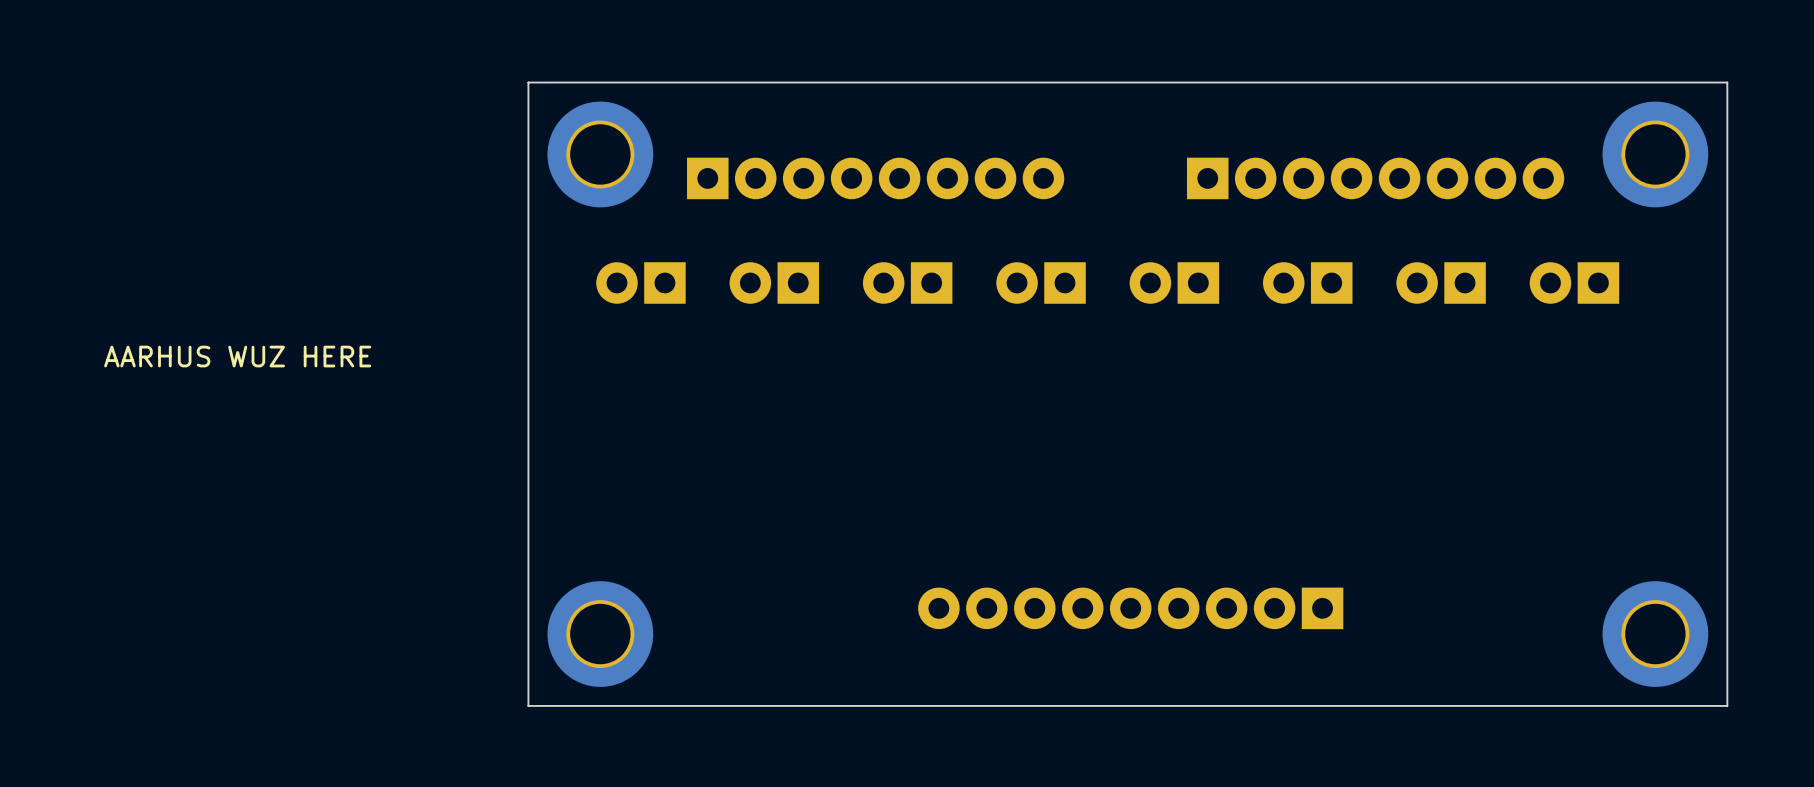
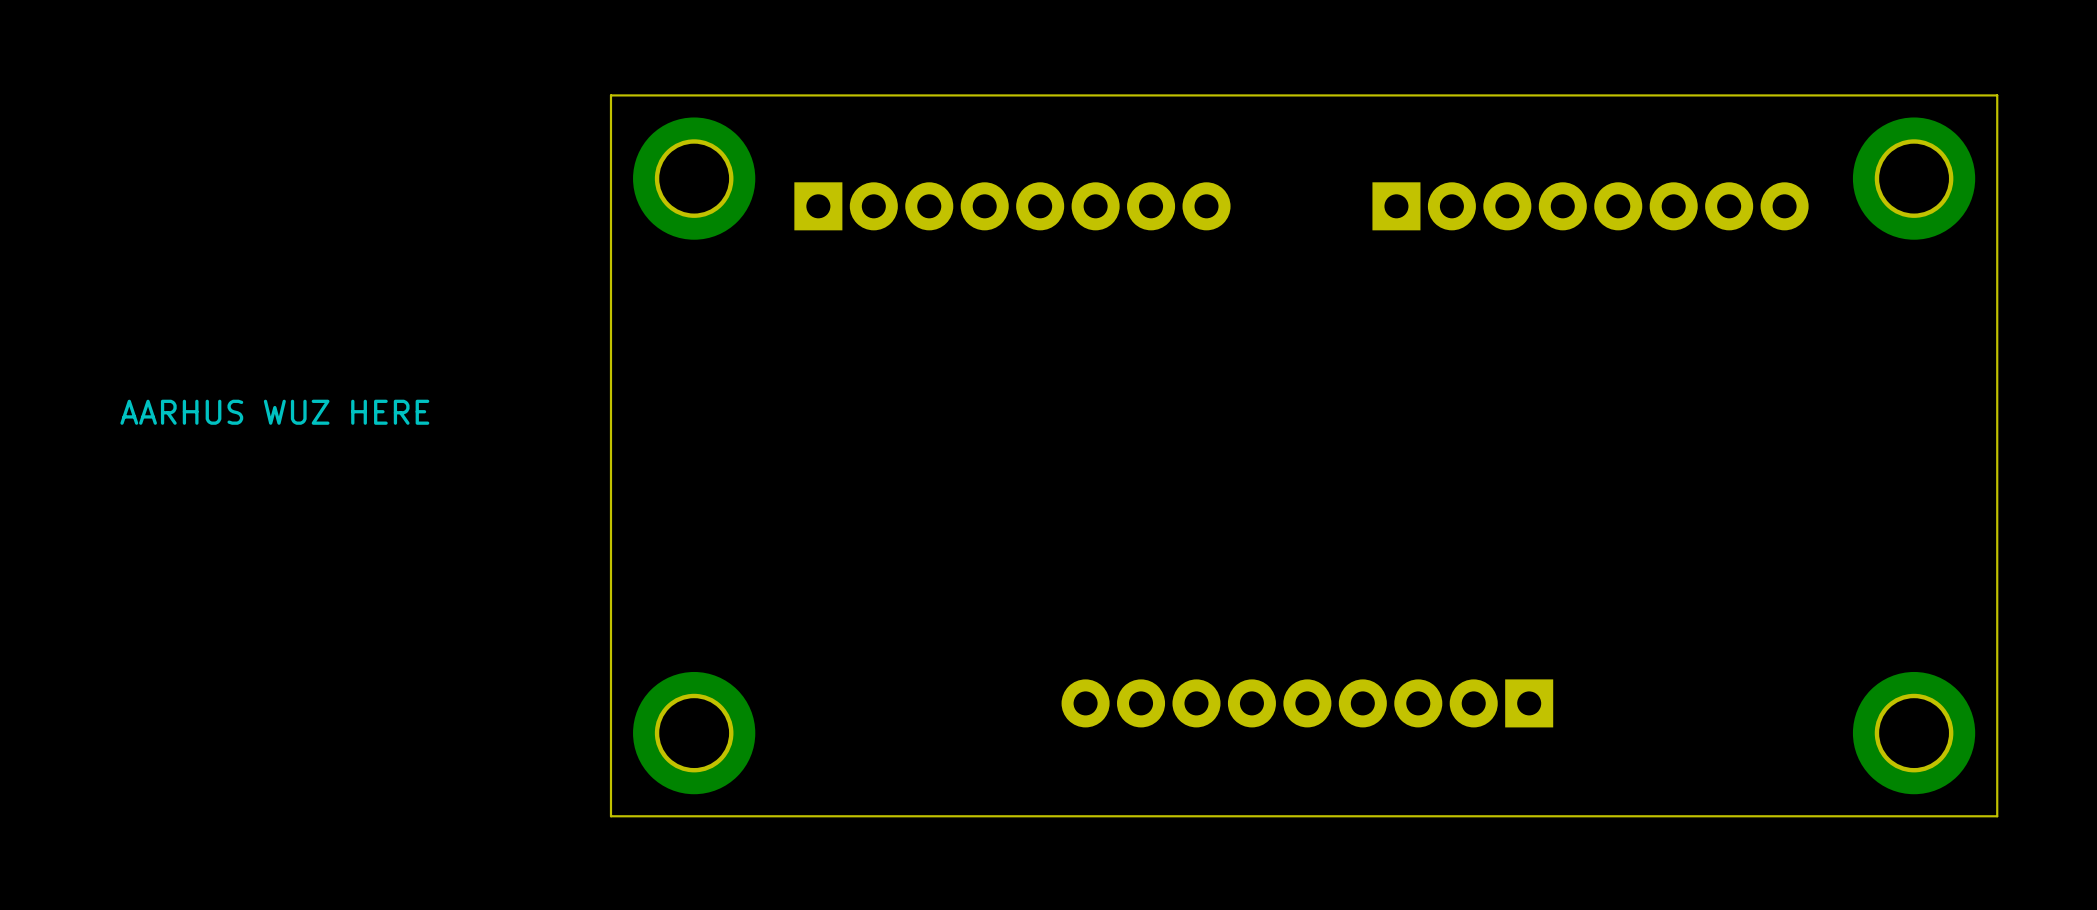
part: (640, 282) -> none
part: (774, 282) -> none
part: (907, 282) -> none
part: (1041, 282) -> none
part: (1174, 282) -> none
part: (1307, 282) -> none
part: (1441, 282) -> none
part: (1574, 282) -> none

